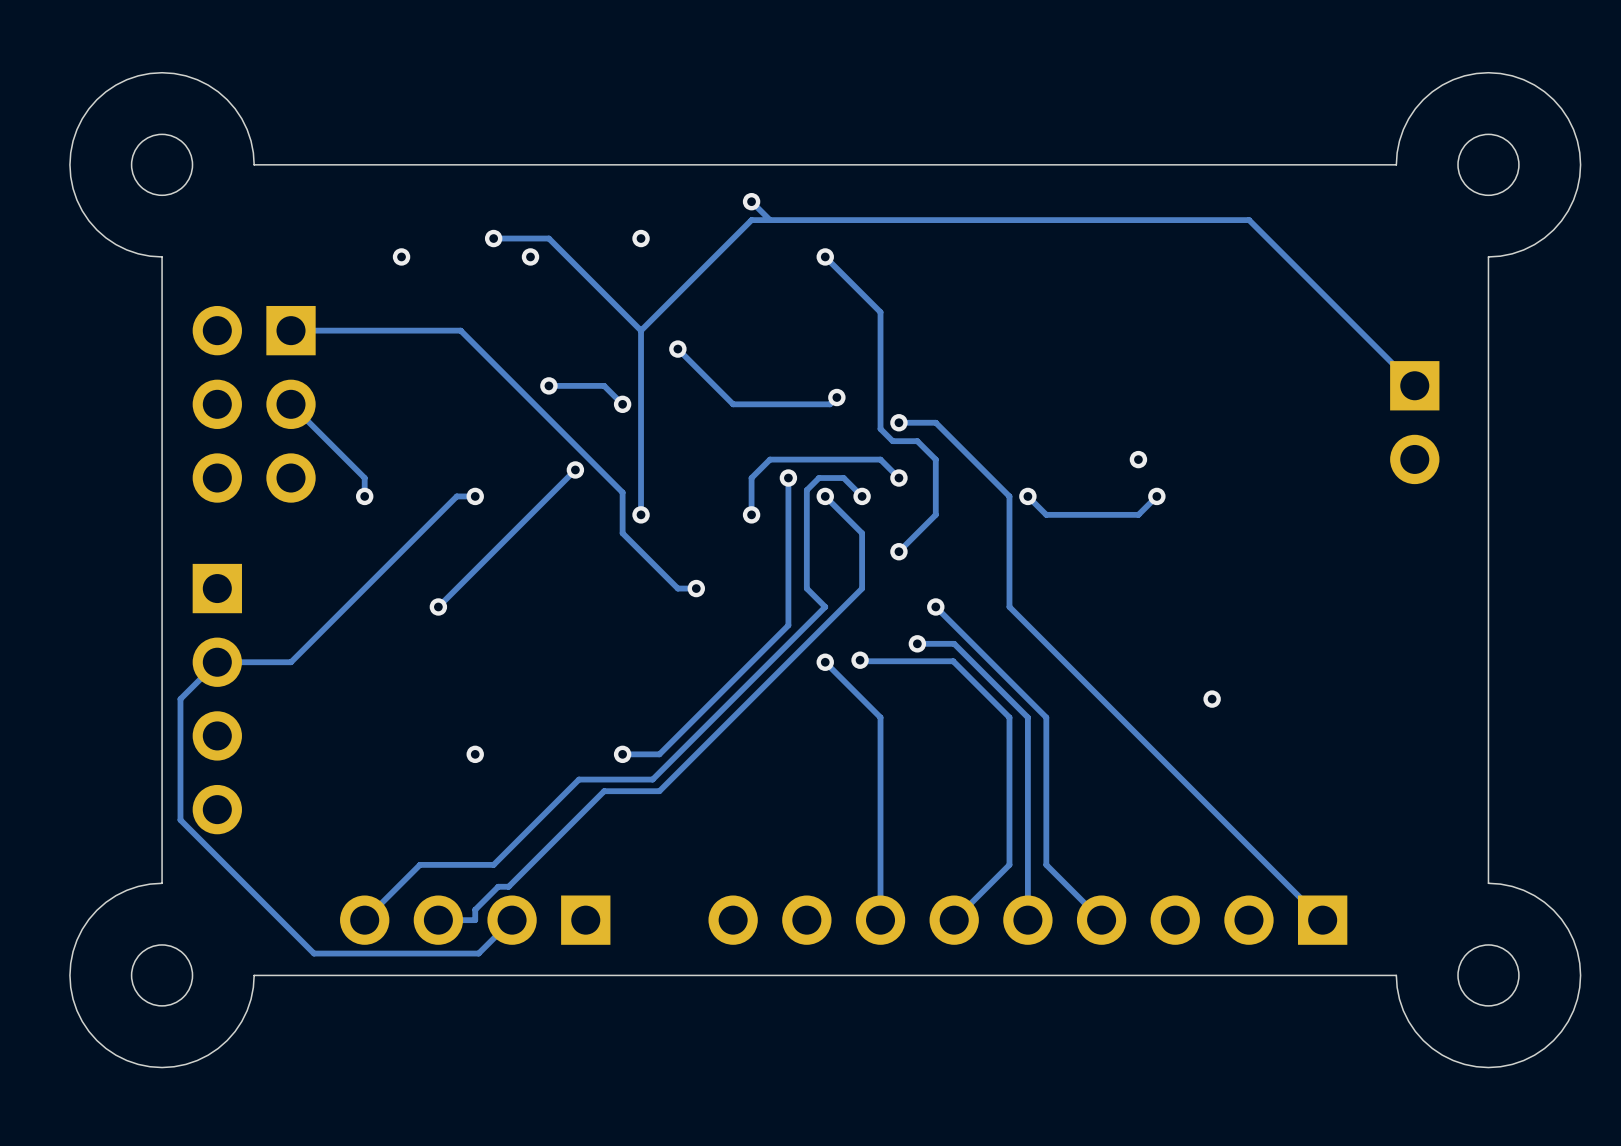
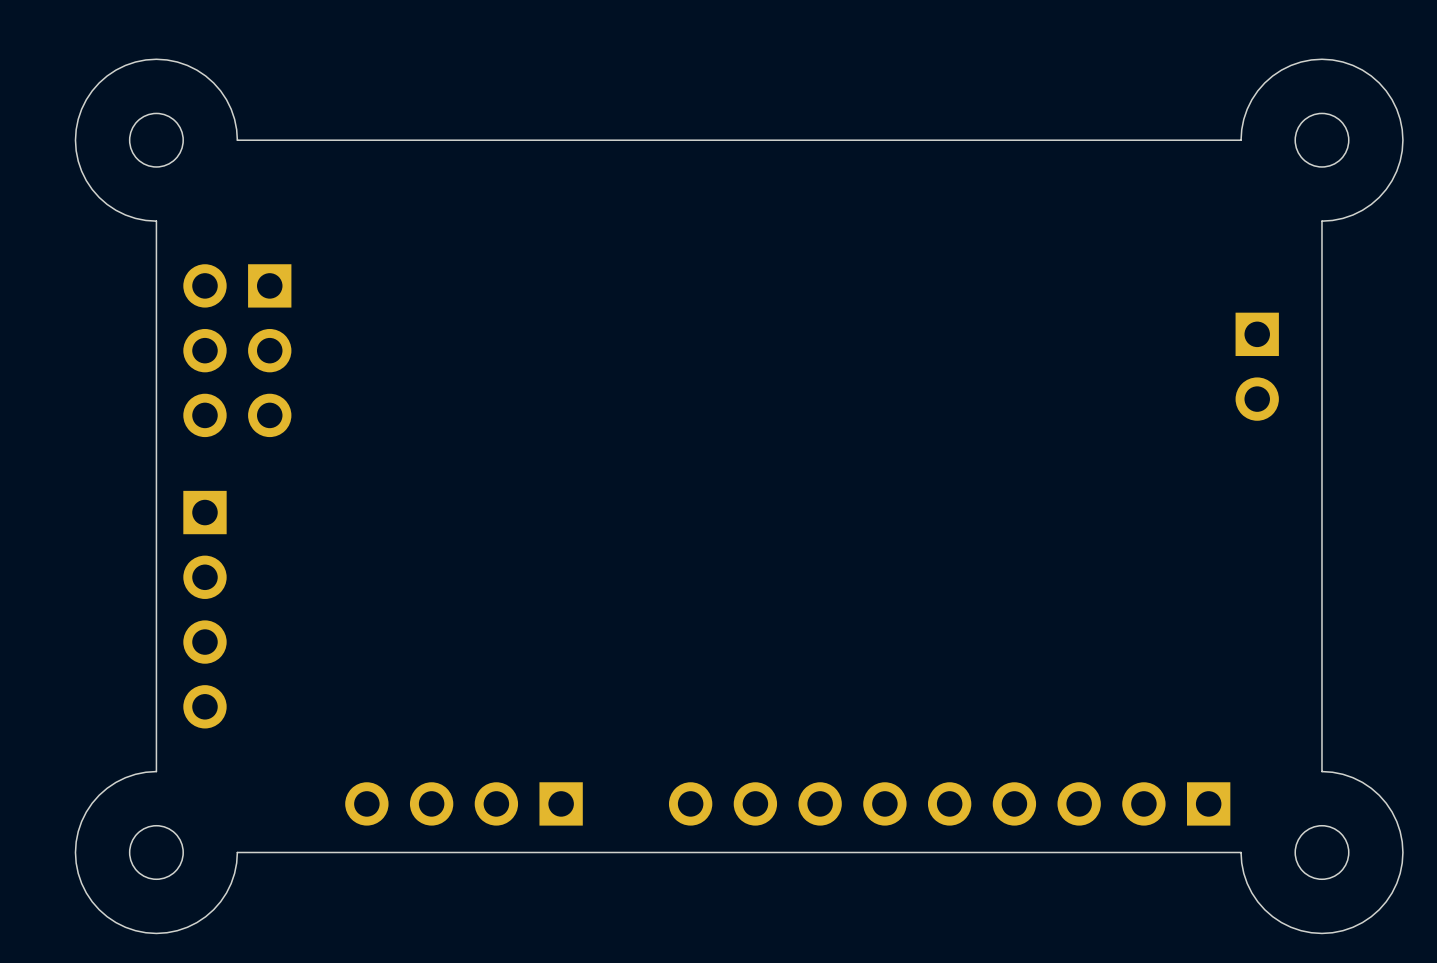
track: (751, 201) (769, 220) -> none
via: (751, 201) -> none
track: (493, 238) (548, 238) (641, 330) -> none
via: (493, 238) -> none
via: (641, 238) -> none
via: (401, 256) -> none
via: (530, 256) -> none
track: (825, 256) (880, 312) (880, 428) (892, 441) (917, 441) (935, 459) (935, 514) (898, 551) -> none
via: (825, 256) -> none
track: (291, 330) (460, 330) (622, 492) (622, 533) (677, 588) (696, 588) -> none
track: (641, 330) (641, 514) -> none
track: (641, 330) (751, 220) (1249, 220) (1414, 385) -> none
track: (677, 349) (733, 404) (830, 404) (836, 397) -> none
via: (677, 349) -> none
track: (548, 385) (604, 385) (622, 404) -> none
via: (548, 385) -> none
via: (836, 397) -> none
track: (291, 404) (364, 478) (364, 496) -> none
via: (622, 404) -> none
track: (898, 422) (935, 422) (1009, 496) (1009, 606) (1322, 920) -> none
via: (898, 422) -> none
via: (1138, 459) -> none
track: (575, 469) (438, 606) -> none
via: (575, 469) -> none
track: (788, 478) (788, 625) (659, 754) (622, 754) -> none
via: (788, 478) -> none
track: (898, 478) (880, 459) (769, 459) (751, 478) (751, 514) -> none
via: (898, 478) -> none
via: (364, 496) -> none
track: (475, 496) (456, 496) (291, 662) (217, 662) (180, 699) (180, 820) (314, 953) (478, 953) (512, 920) -> none
via: (475, 496) -> none
track: (825, 496) (862, 533) (862, 588) (659, 791) (604, 791) (508, 886) (498, 886) (475, 909) (475, 920) (438, 920) -> none
via: (825, 496) -> none
track: (862, 496) (843, 478) (819, 478) (806, 490) (806, 588) (825, 606) (652, 779) (578, 779) (493, 864) (419, 864) (364, 920) -> none
via: (862, 496) -> none
via: (1027, 496) -> none
track: (1156, 496) (1138, 514) (1046, 514) (1027, 496) -> none
via: (1156, 496) -> none
via: (641, 514) -> none
via: (751, 514) -> none
via: (898, 551) -> none
via: (696, 588) -> none
via: (438, 606) -> none
track: (935, 606) (1046, 717) (1046, 864) (1101, 920) -> none
via: (935, 606) -> none
track: (917, 643) (954, 643) (1027, 717) (1027, 920) -> none
via: (917, 643) -> none
track: (860, 660) (953, 661) (1009, 717) (1009, 864) (954, 920) -> none
via: (860, 660) -> none
track: (825, 662) (880, 717) (880, 920) -> none
via: (825, 662) -> none
via: (1212, 699) -> none
via: (475, 754) -> none
via: (622, 754) -> none
part position: (475, 920) -> (464, 803)
part position: (1027, 920) -> (949, 803)

